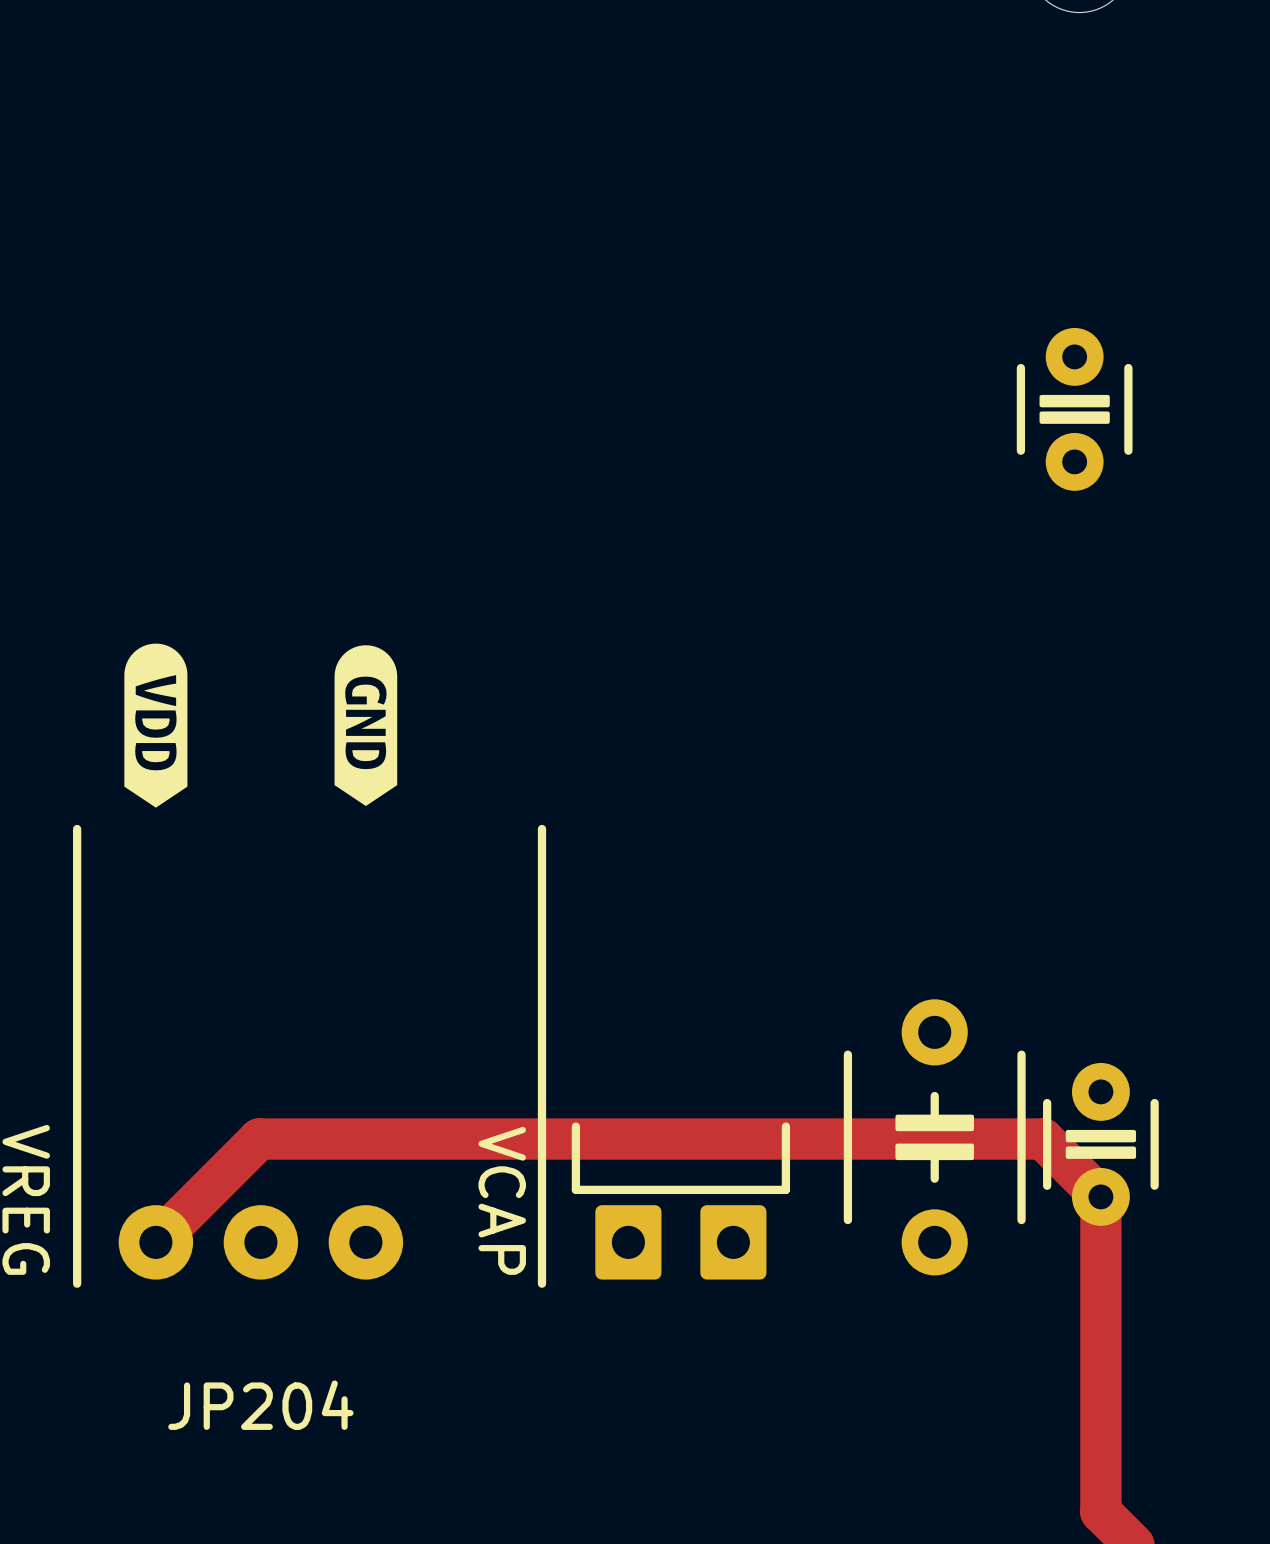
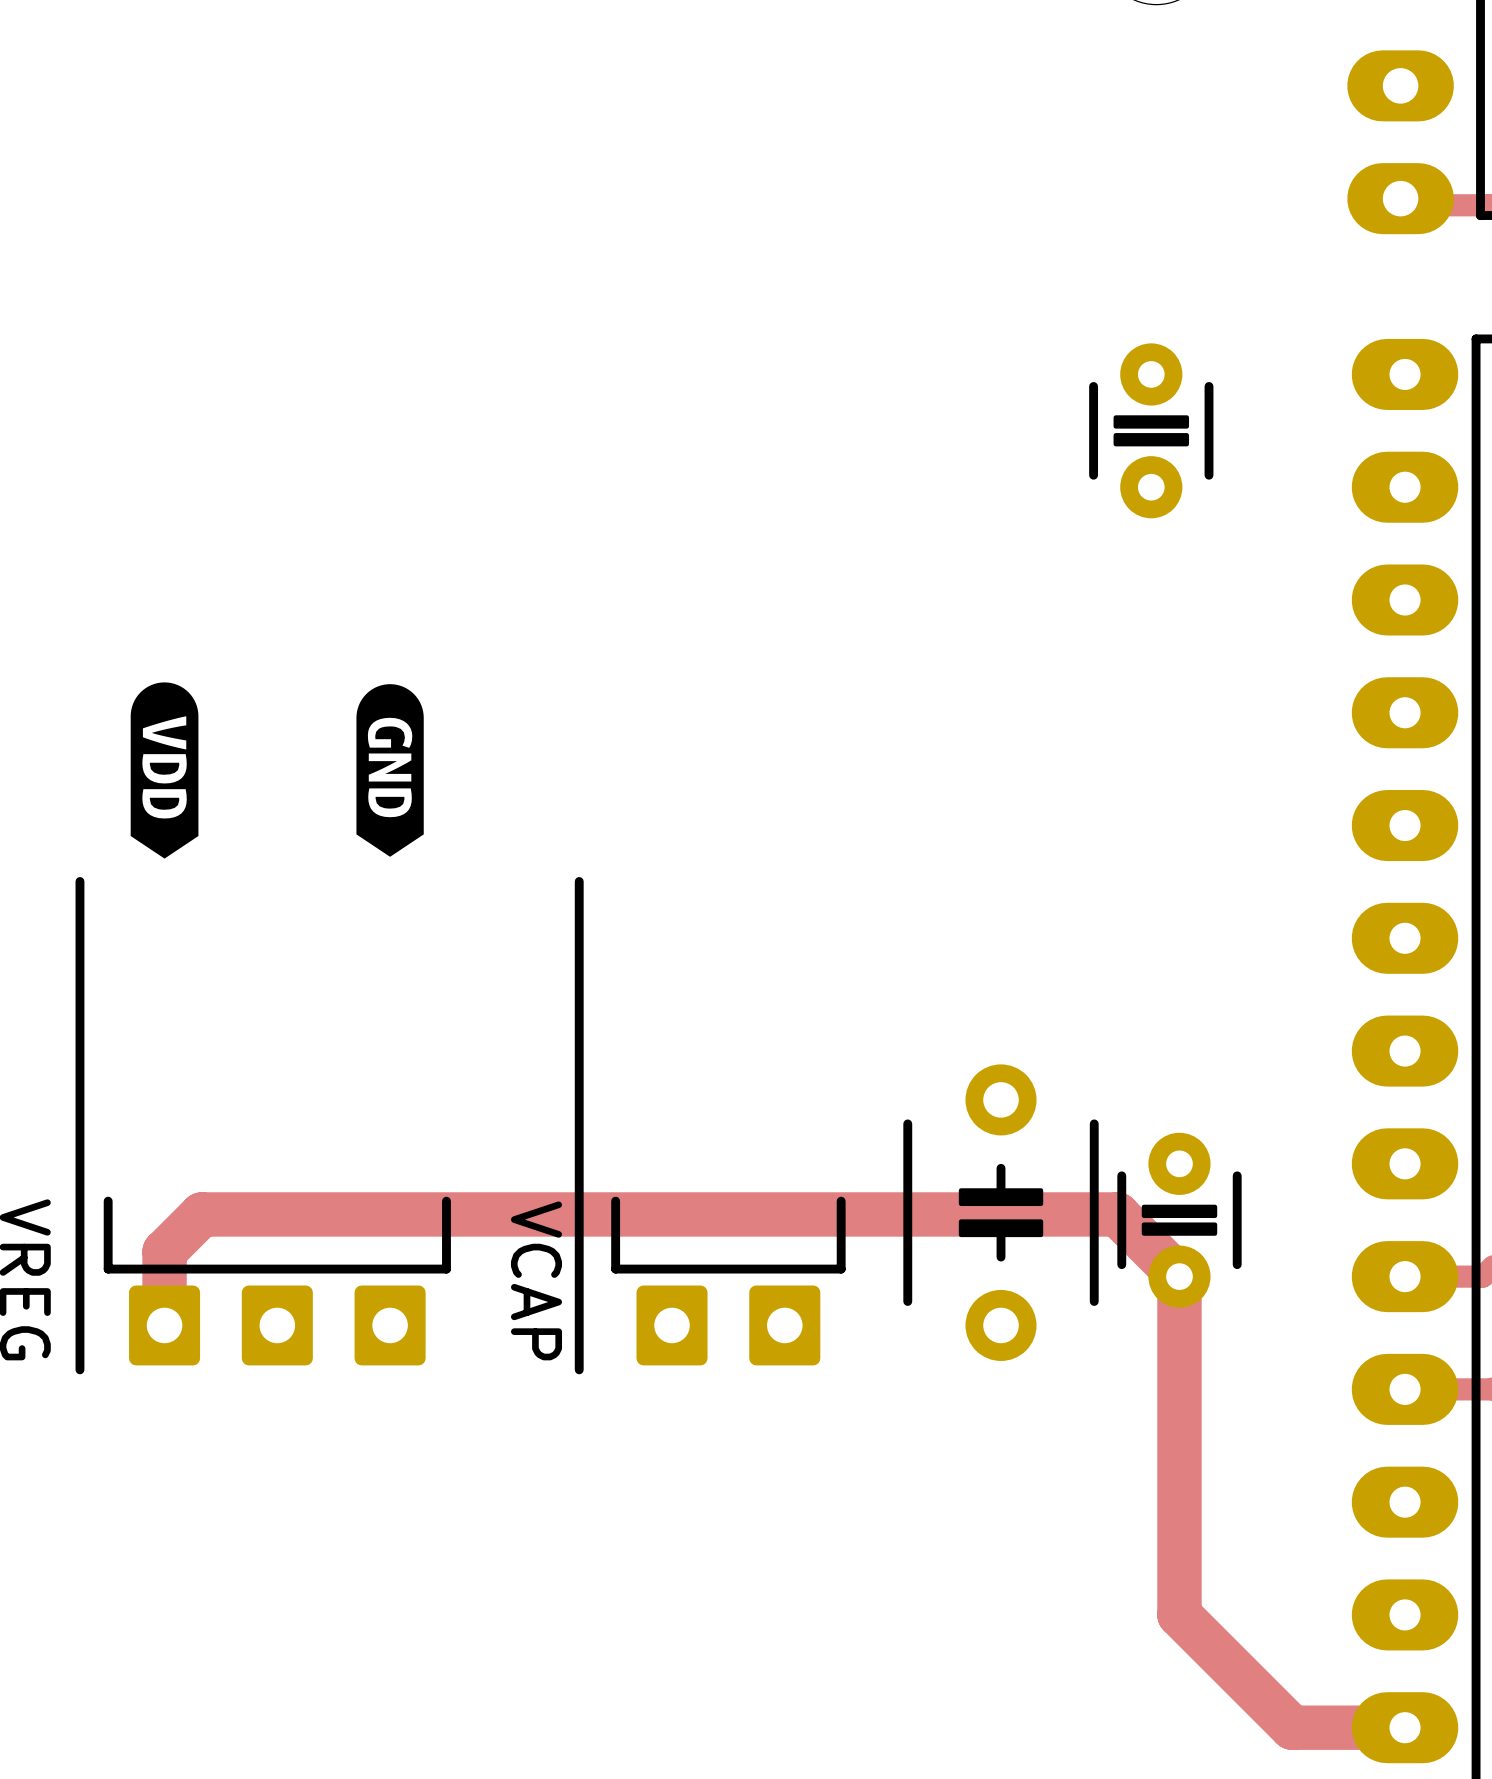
track: (259, 1139) (155, 1242) -> (275, 1214) (201, 1214) (164, 1251) (164, 1325)
part: none -> (277, 1281)
JP204: (260, 1242) -> none

